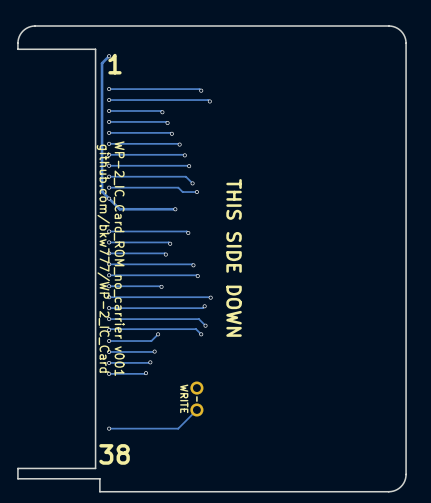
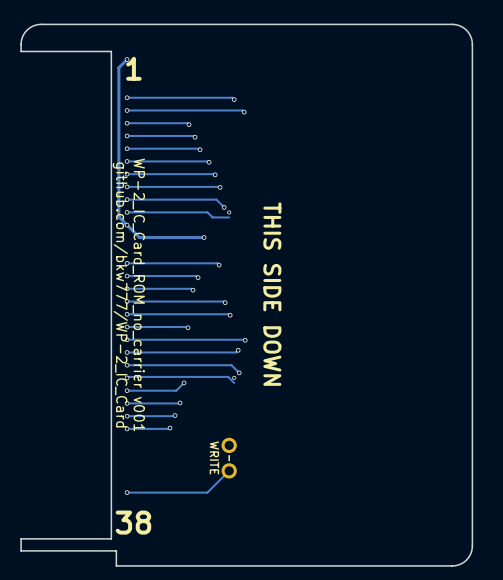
via: none -> (229, 212)
via: (196, 192) -> none
via: none -> (234, 377)
via: (201, 334) -> none

